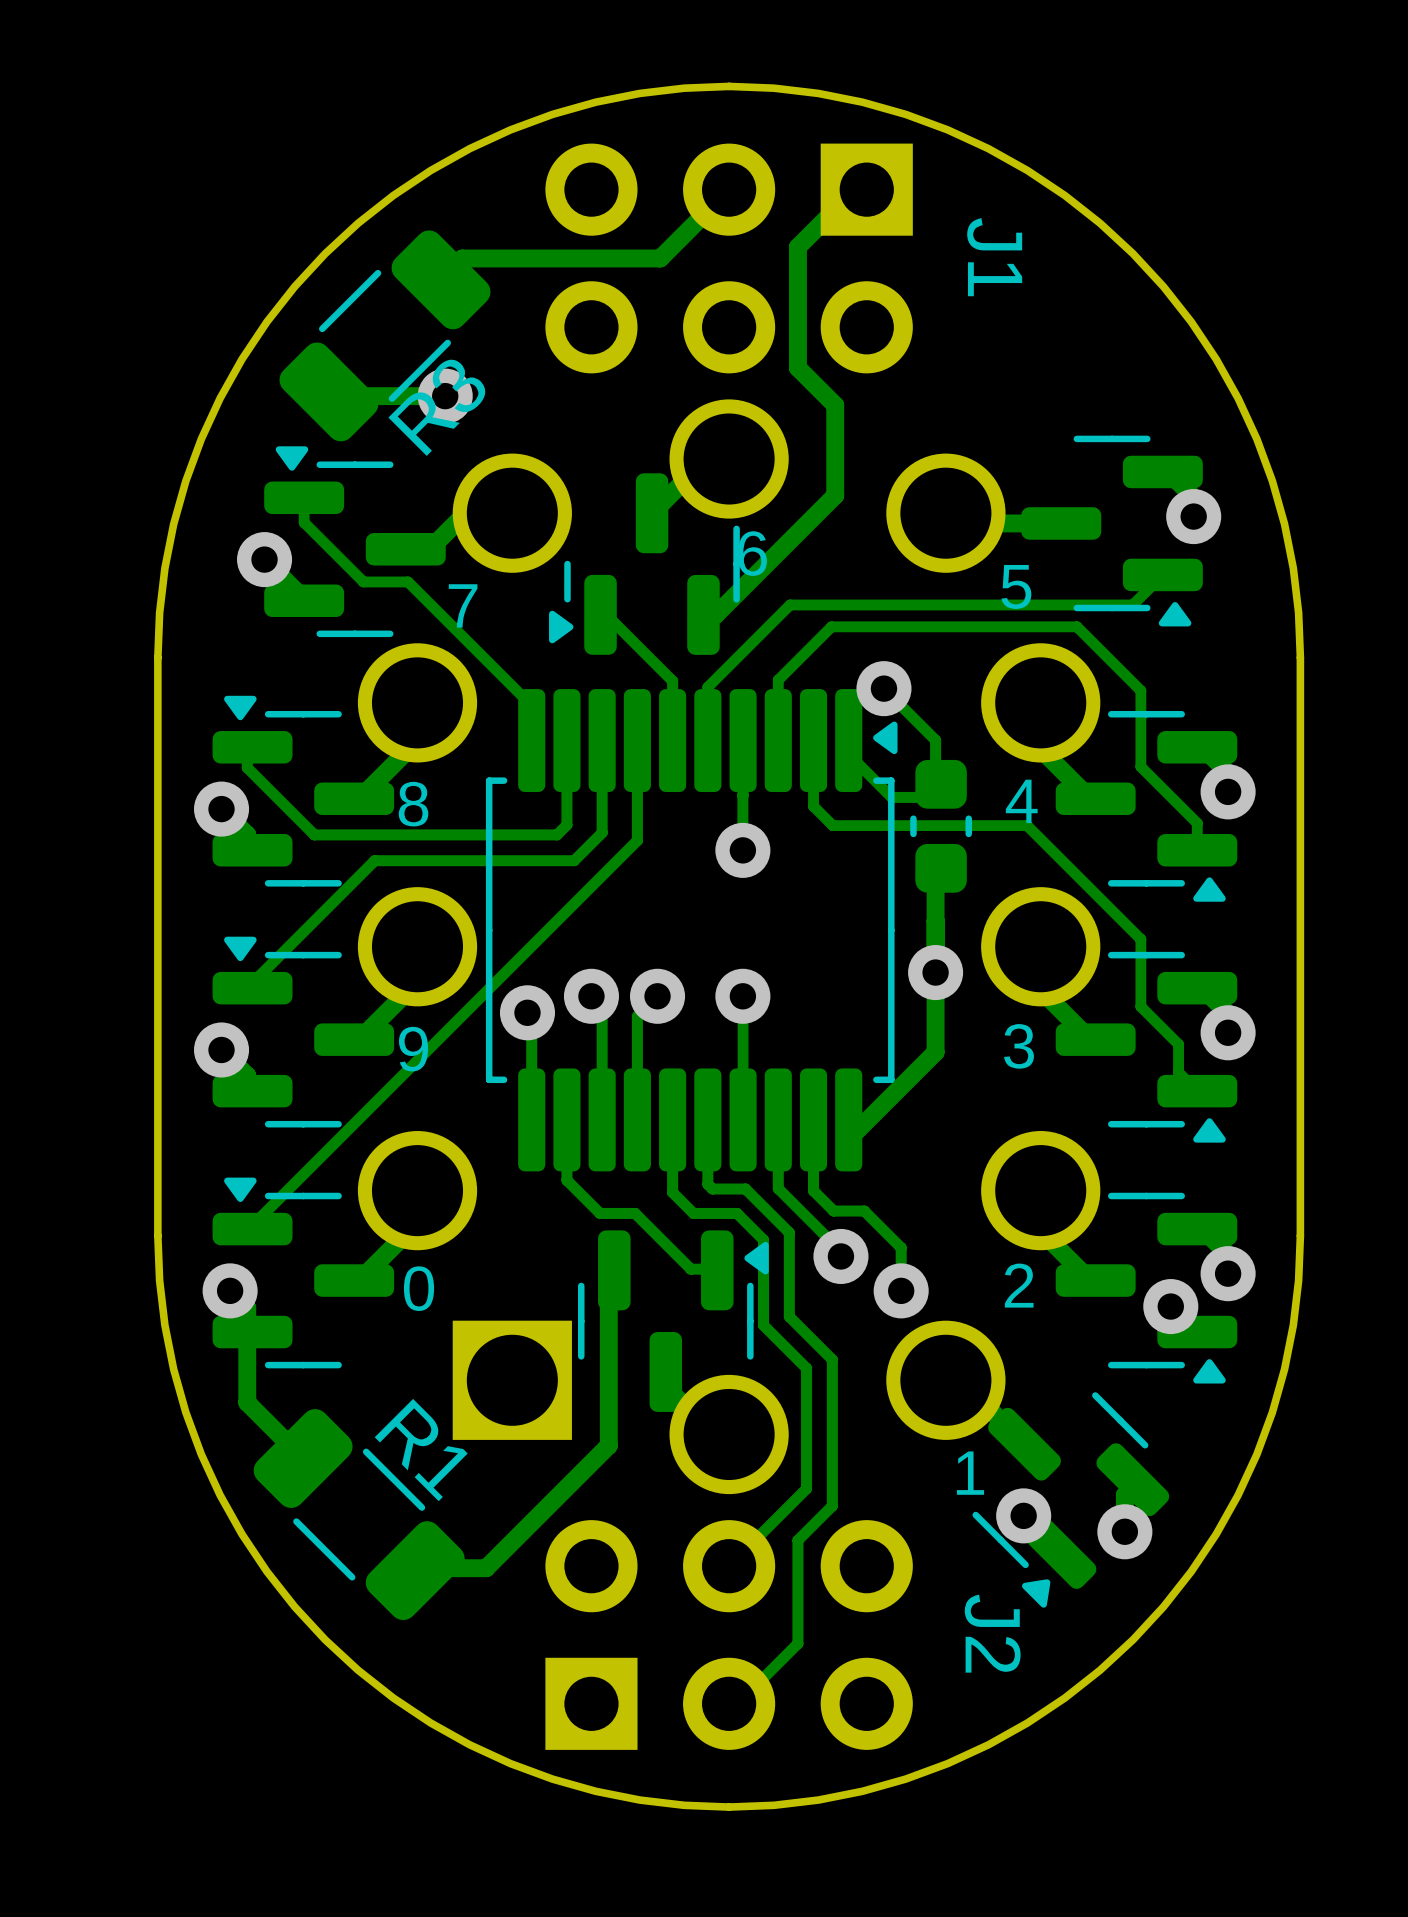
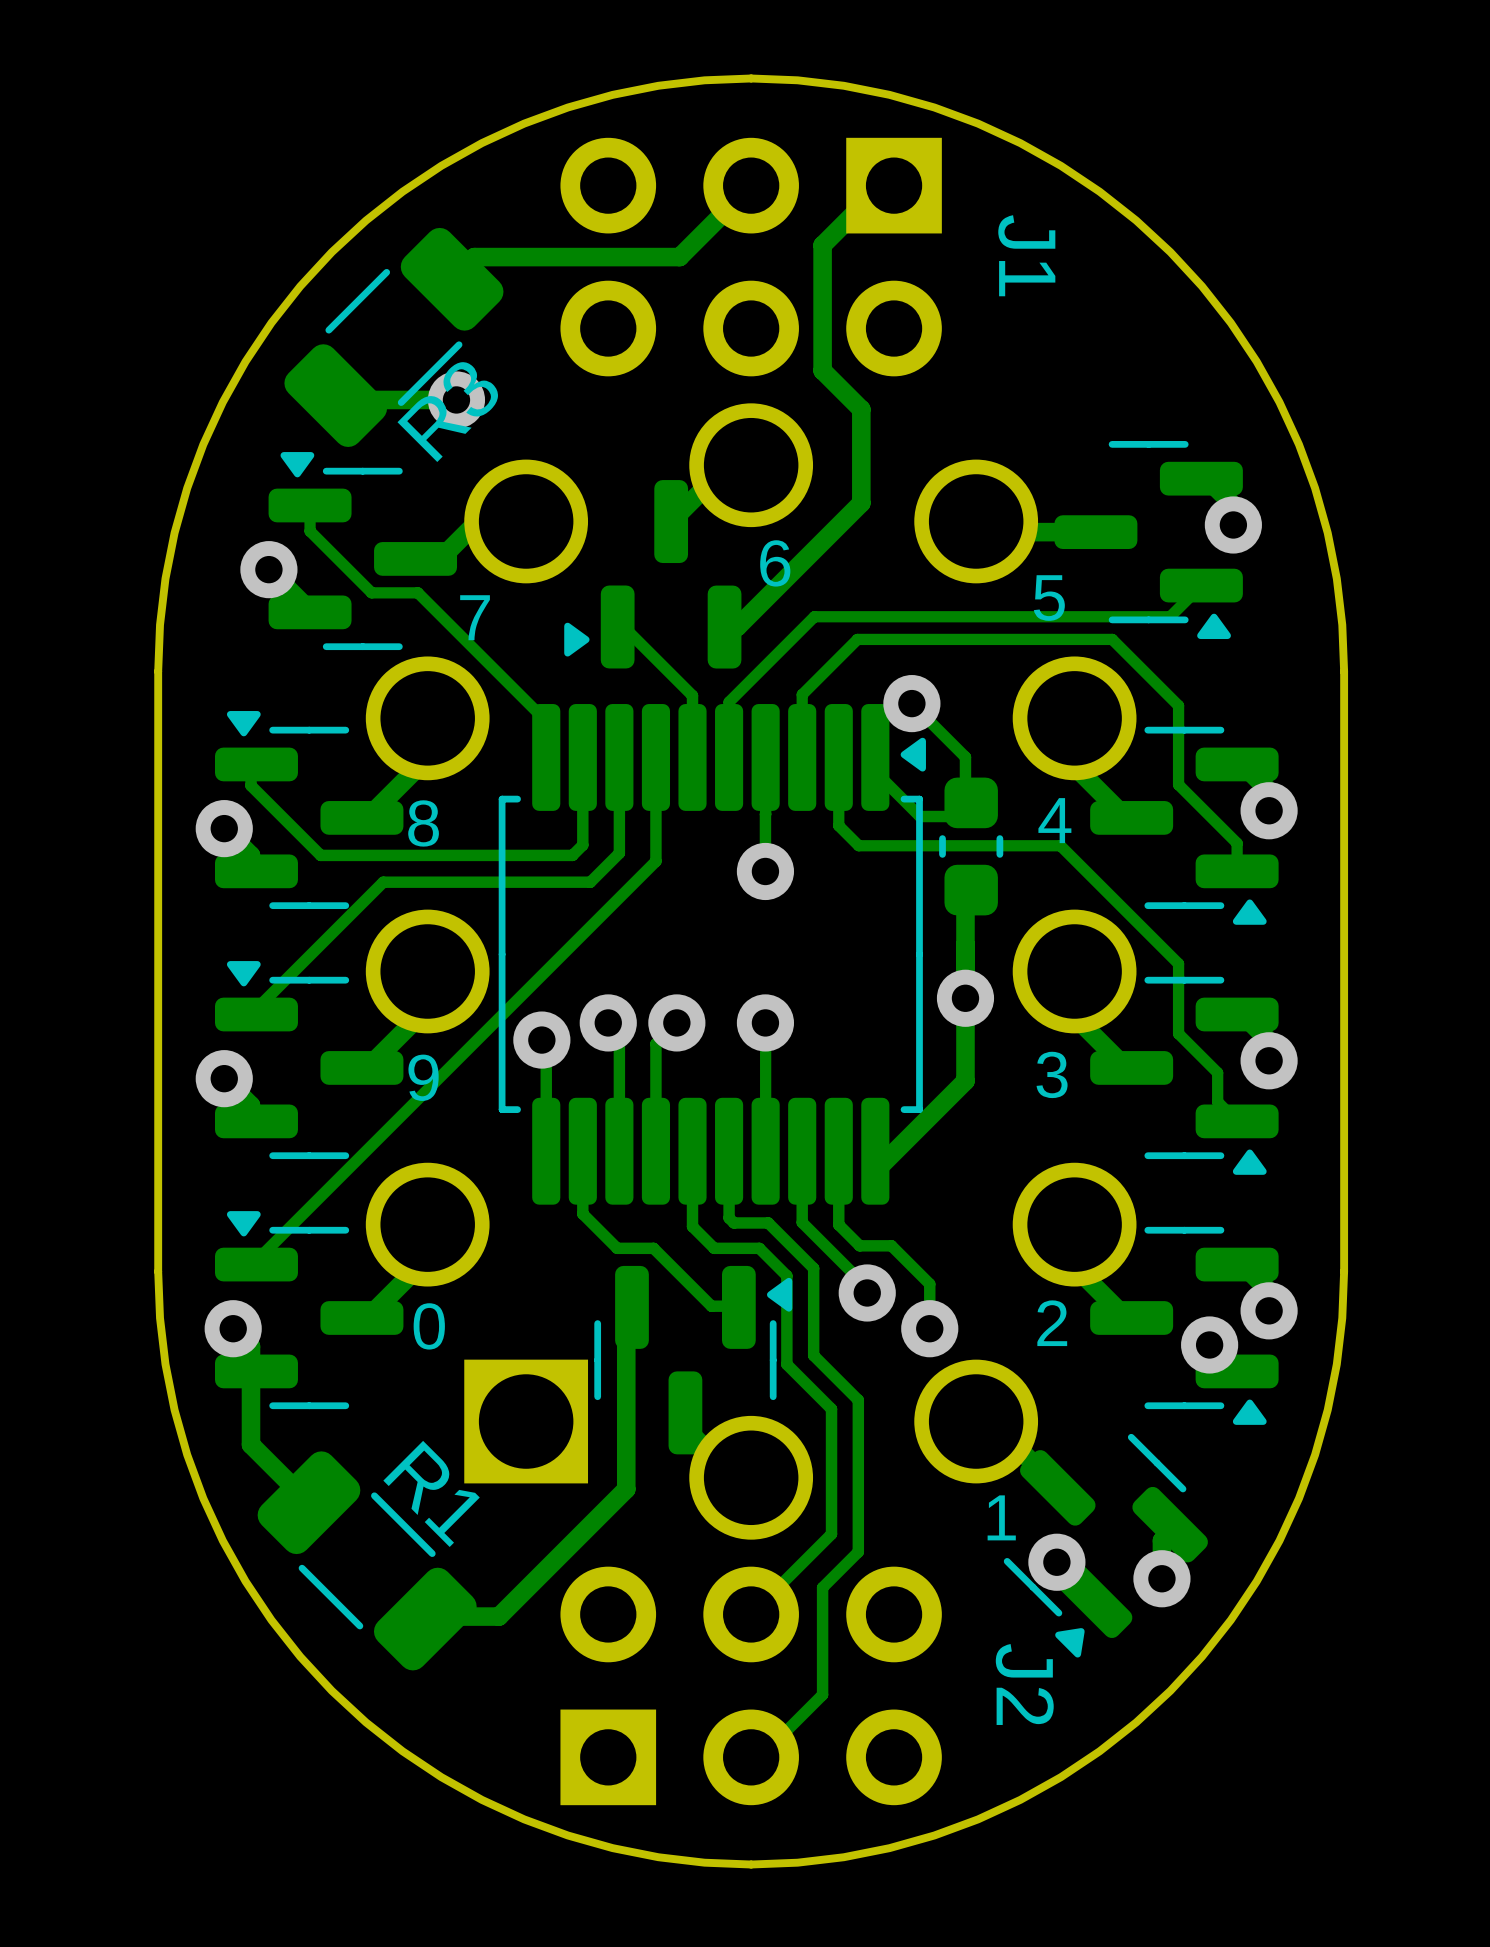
part footprint: [549, 473, 740, 655] -> [564, 480, 742, 669]

